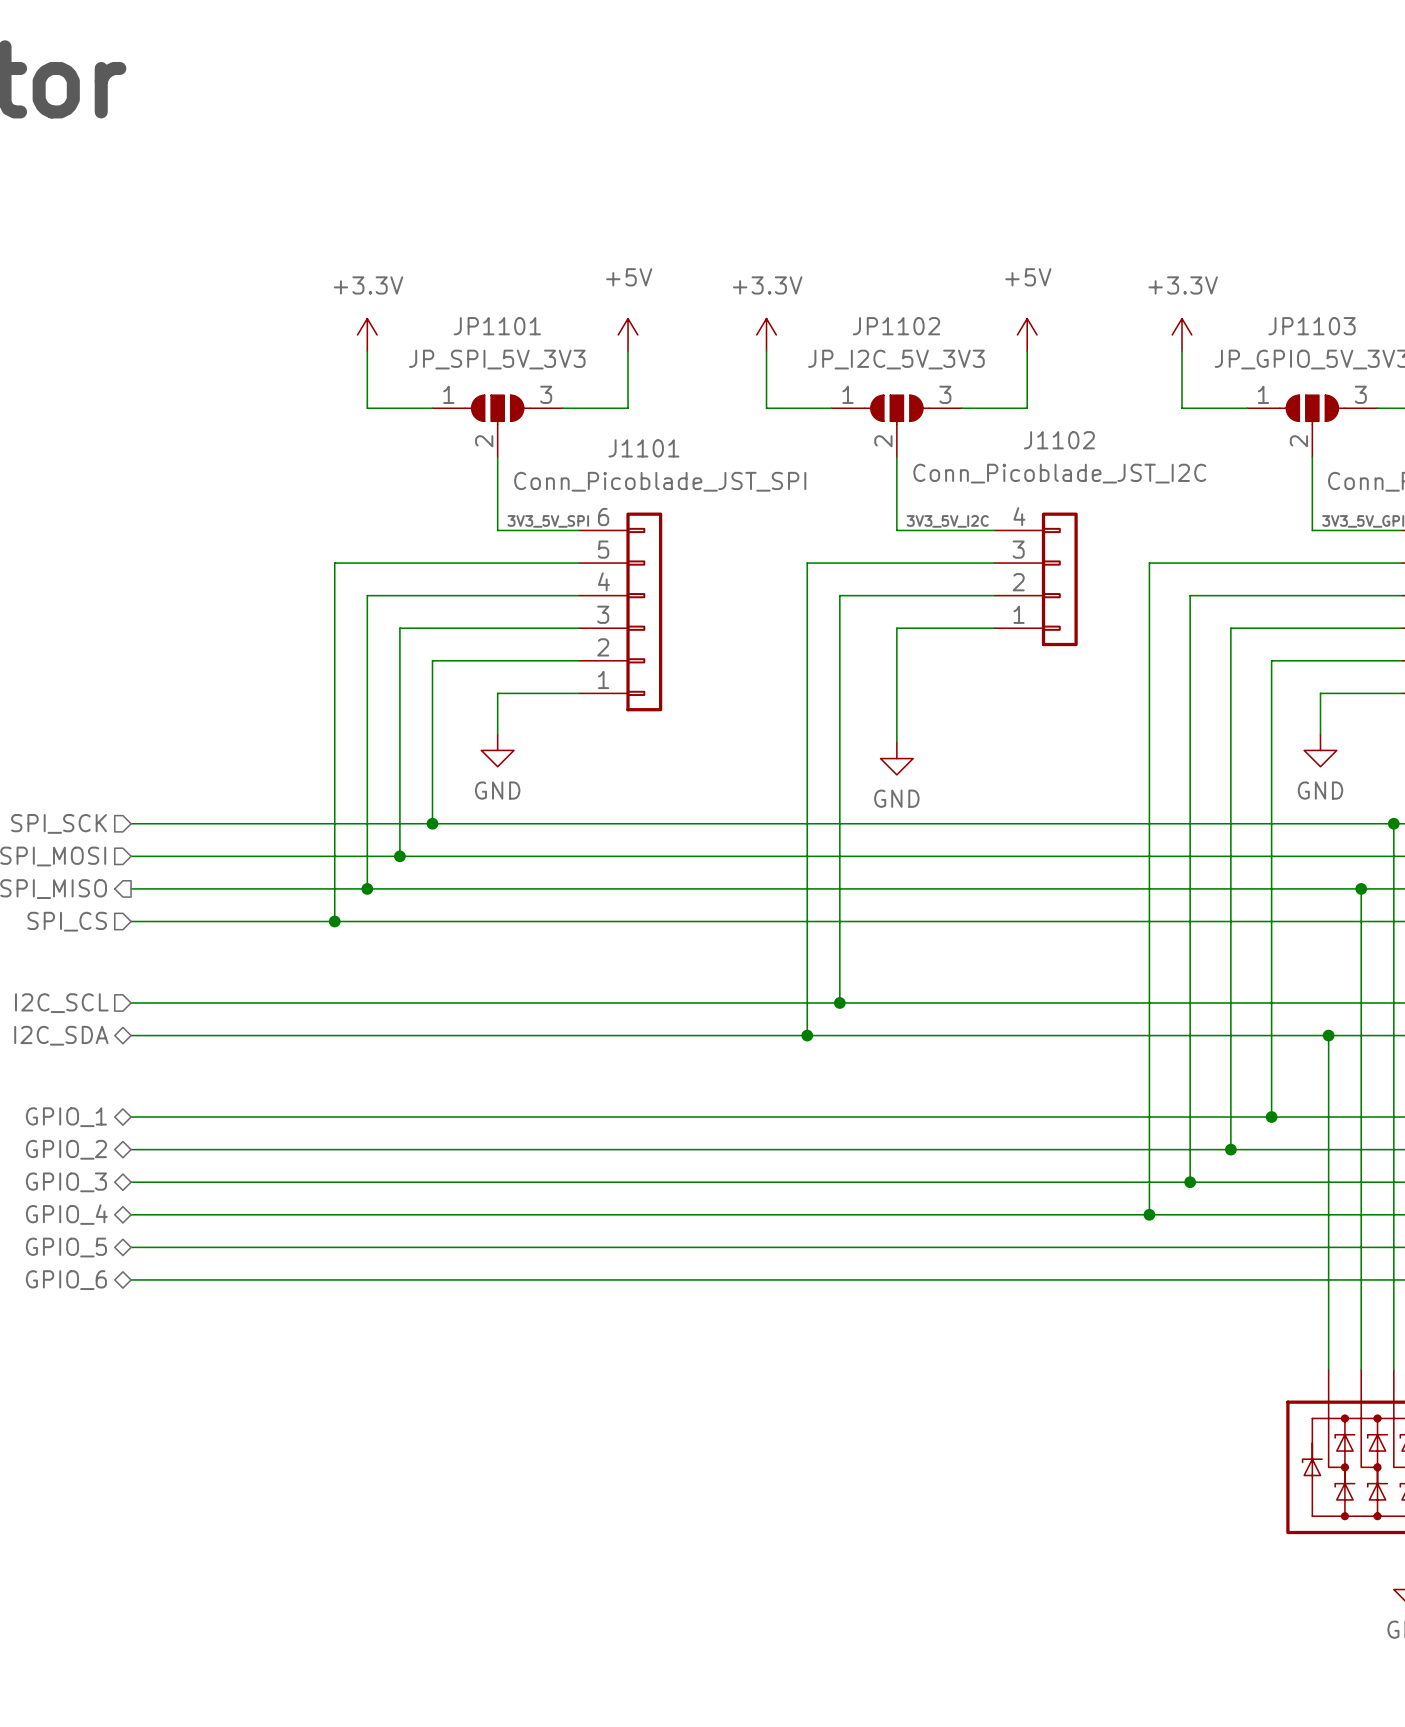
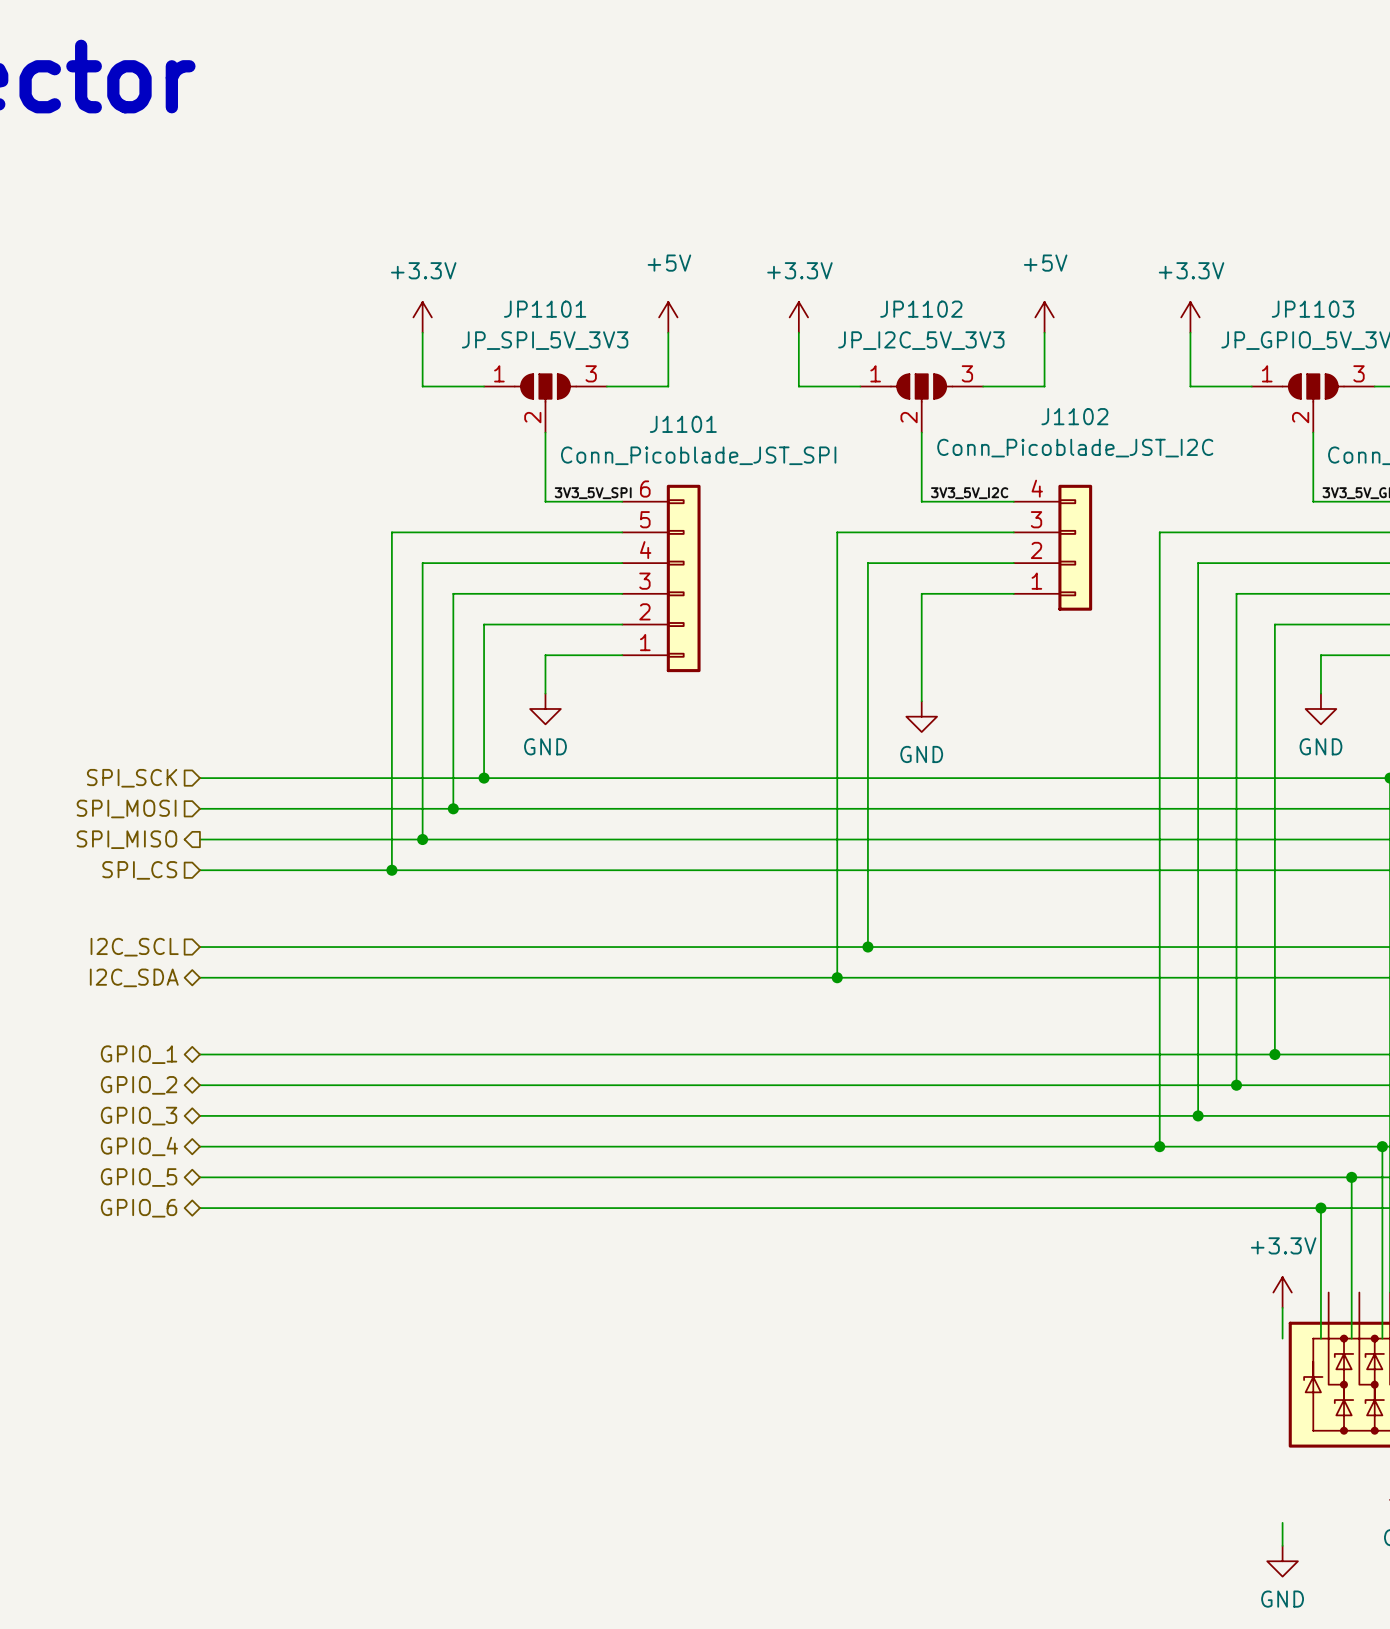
wire: (1361, 888) (1361, 1369) -> none
junction: (1361, 888) -> none
wire: (1328, 1035) (1328, 1369) -> none
junction: (1328, 1035) -> none
wire: none -> (1382, 1146) (1382, 1338)
junction: none -> (1382, 1146)
wire: none -> (1351, 1177) (1351, 1338)
junction: none -> (1351, 1177)
wire: none -> (1320, 1208) (1320, 1338)
junction: none -> (1320, 1208)
power symbol: none -> +3.3V (1282, 1292)
wire: none -> (1282, 1307) (1282, 1338)
wire: none -> (1282, 1522) (1282, 1545)
power symbol: none -> GND (1282, 1561)

